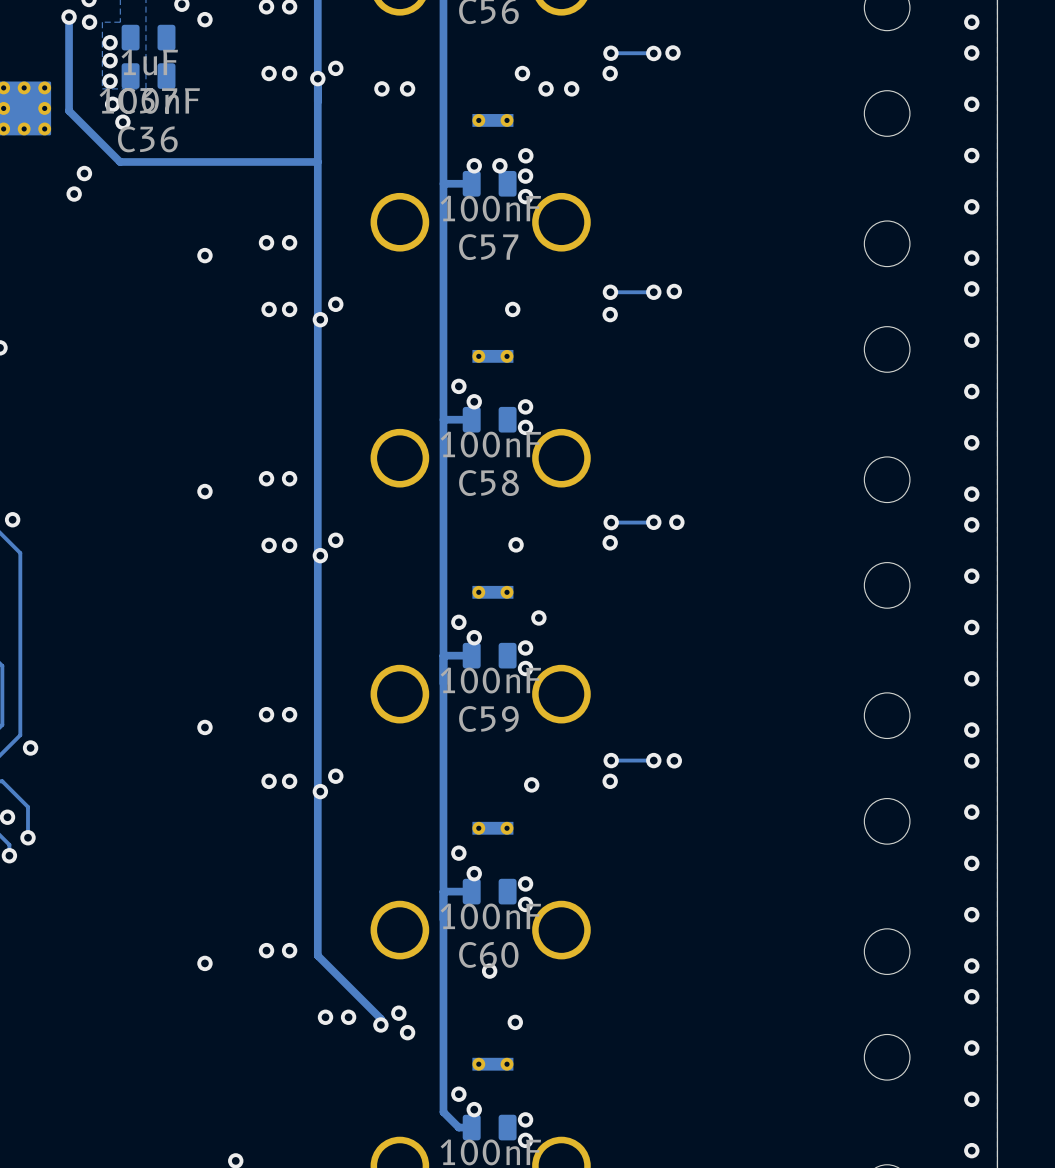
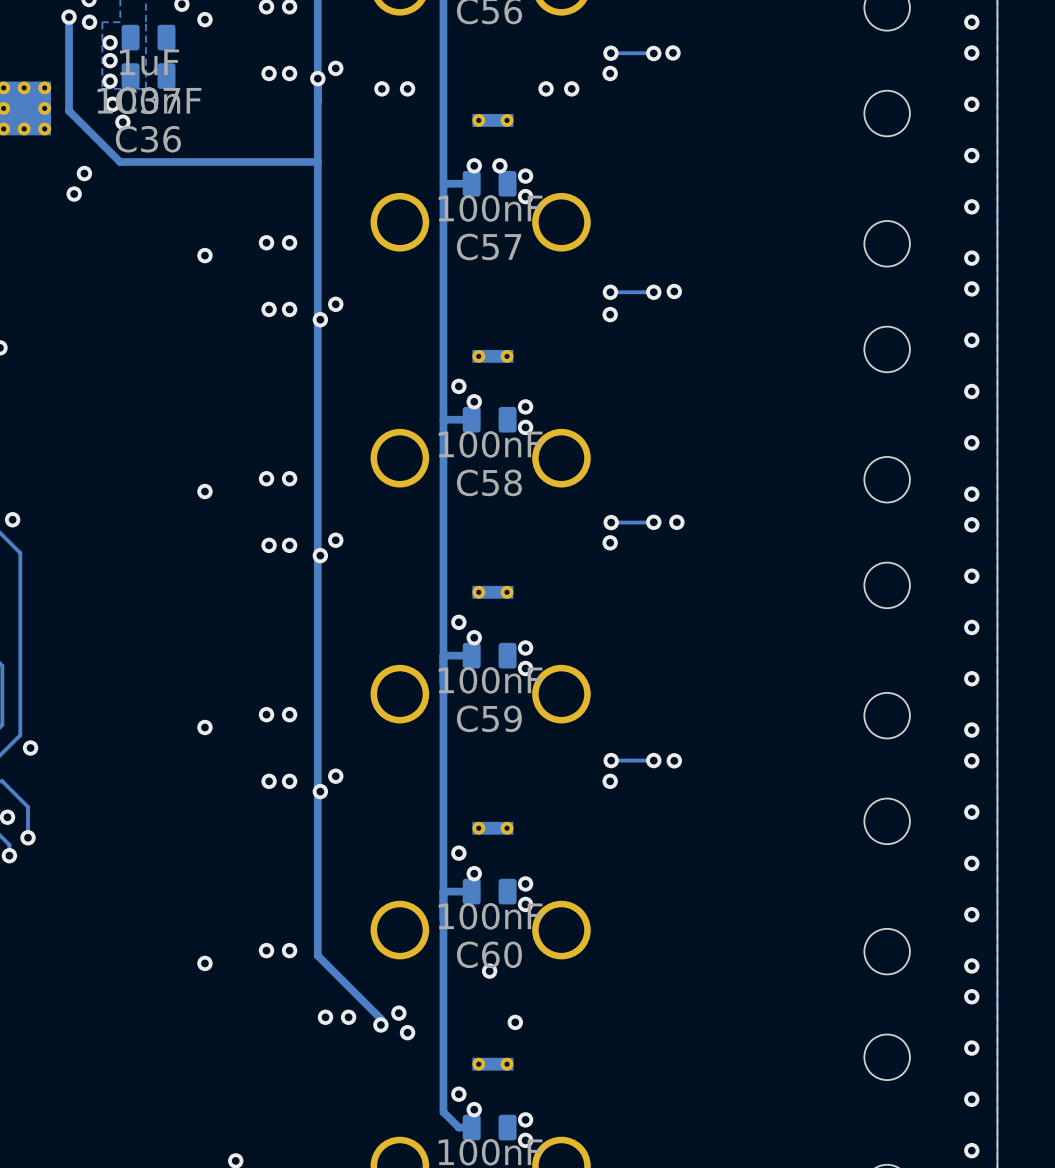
via: (522, 73) -> none
via: (525, 155) -> none
via: (512, 309) -> none
via: (516, 544) -> none
via: (538, 617) -> none
via: (531, 784) -> none

